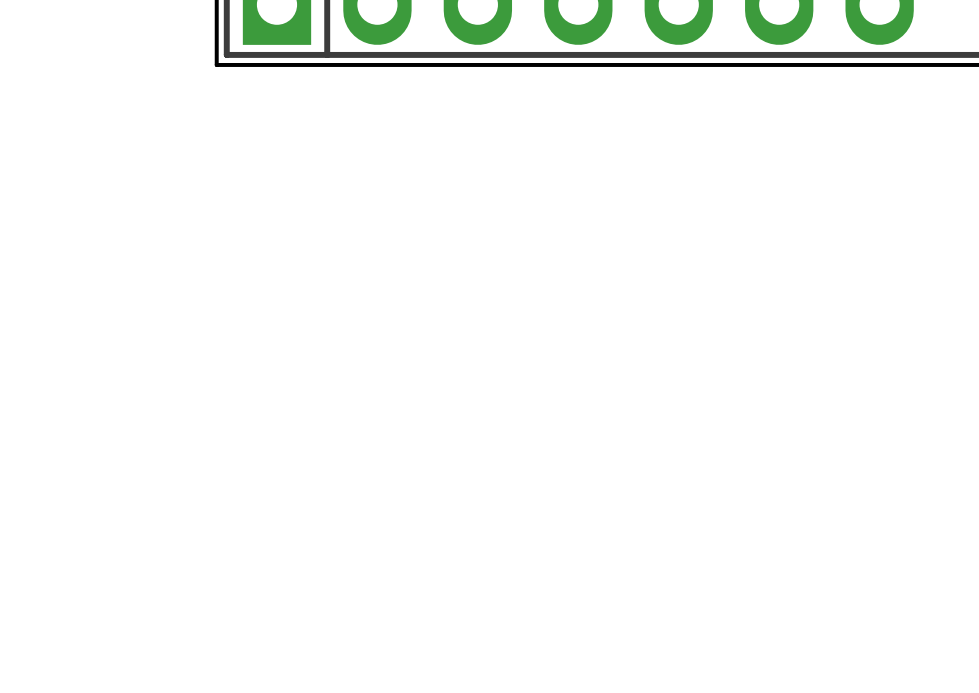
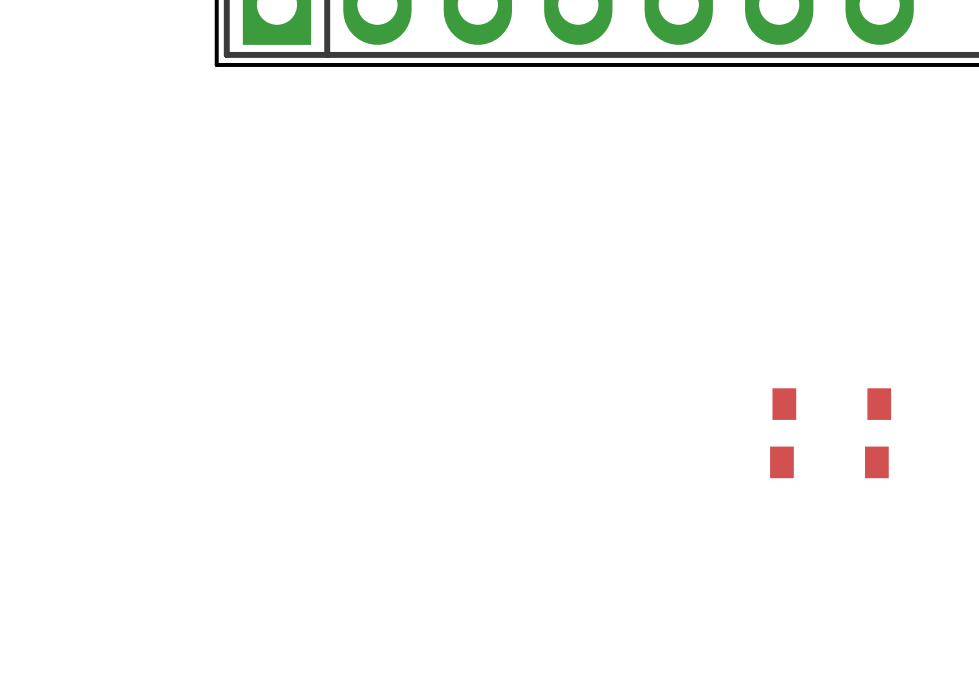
part: none -> (831, 404)
part: none -> (829, 462)

